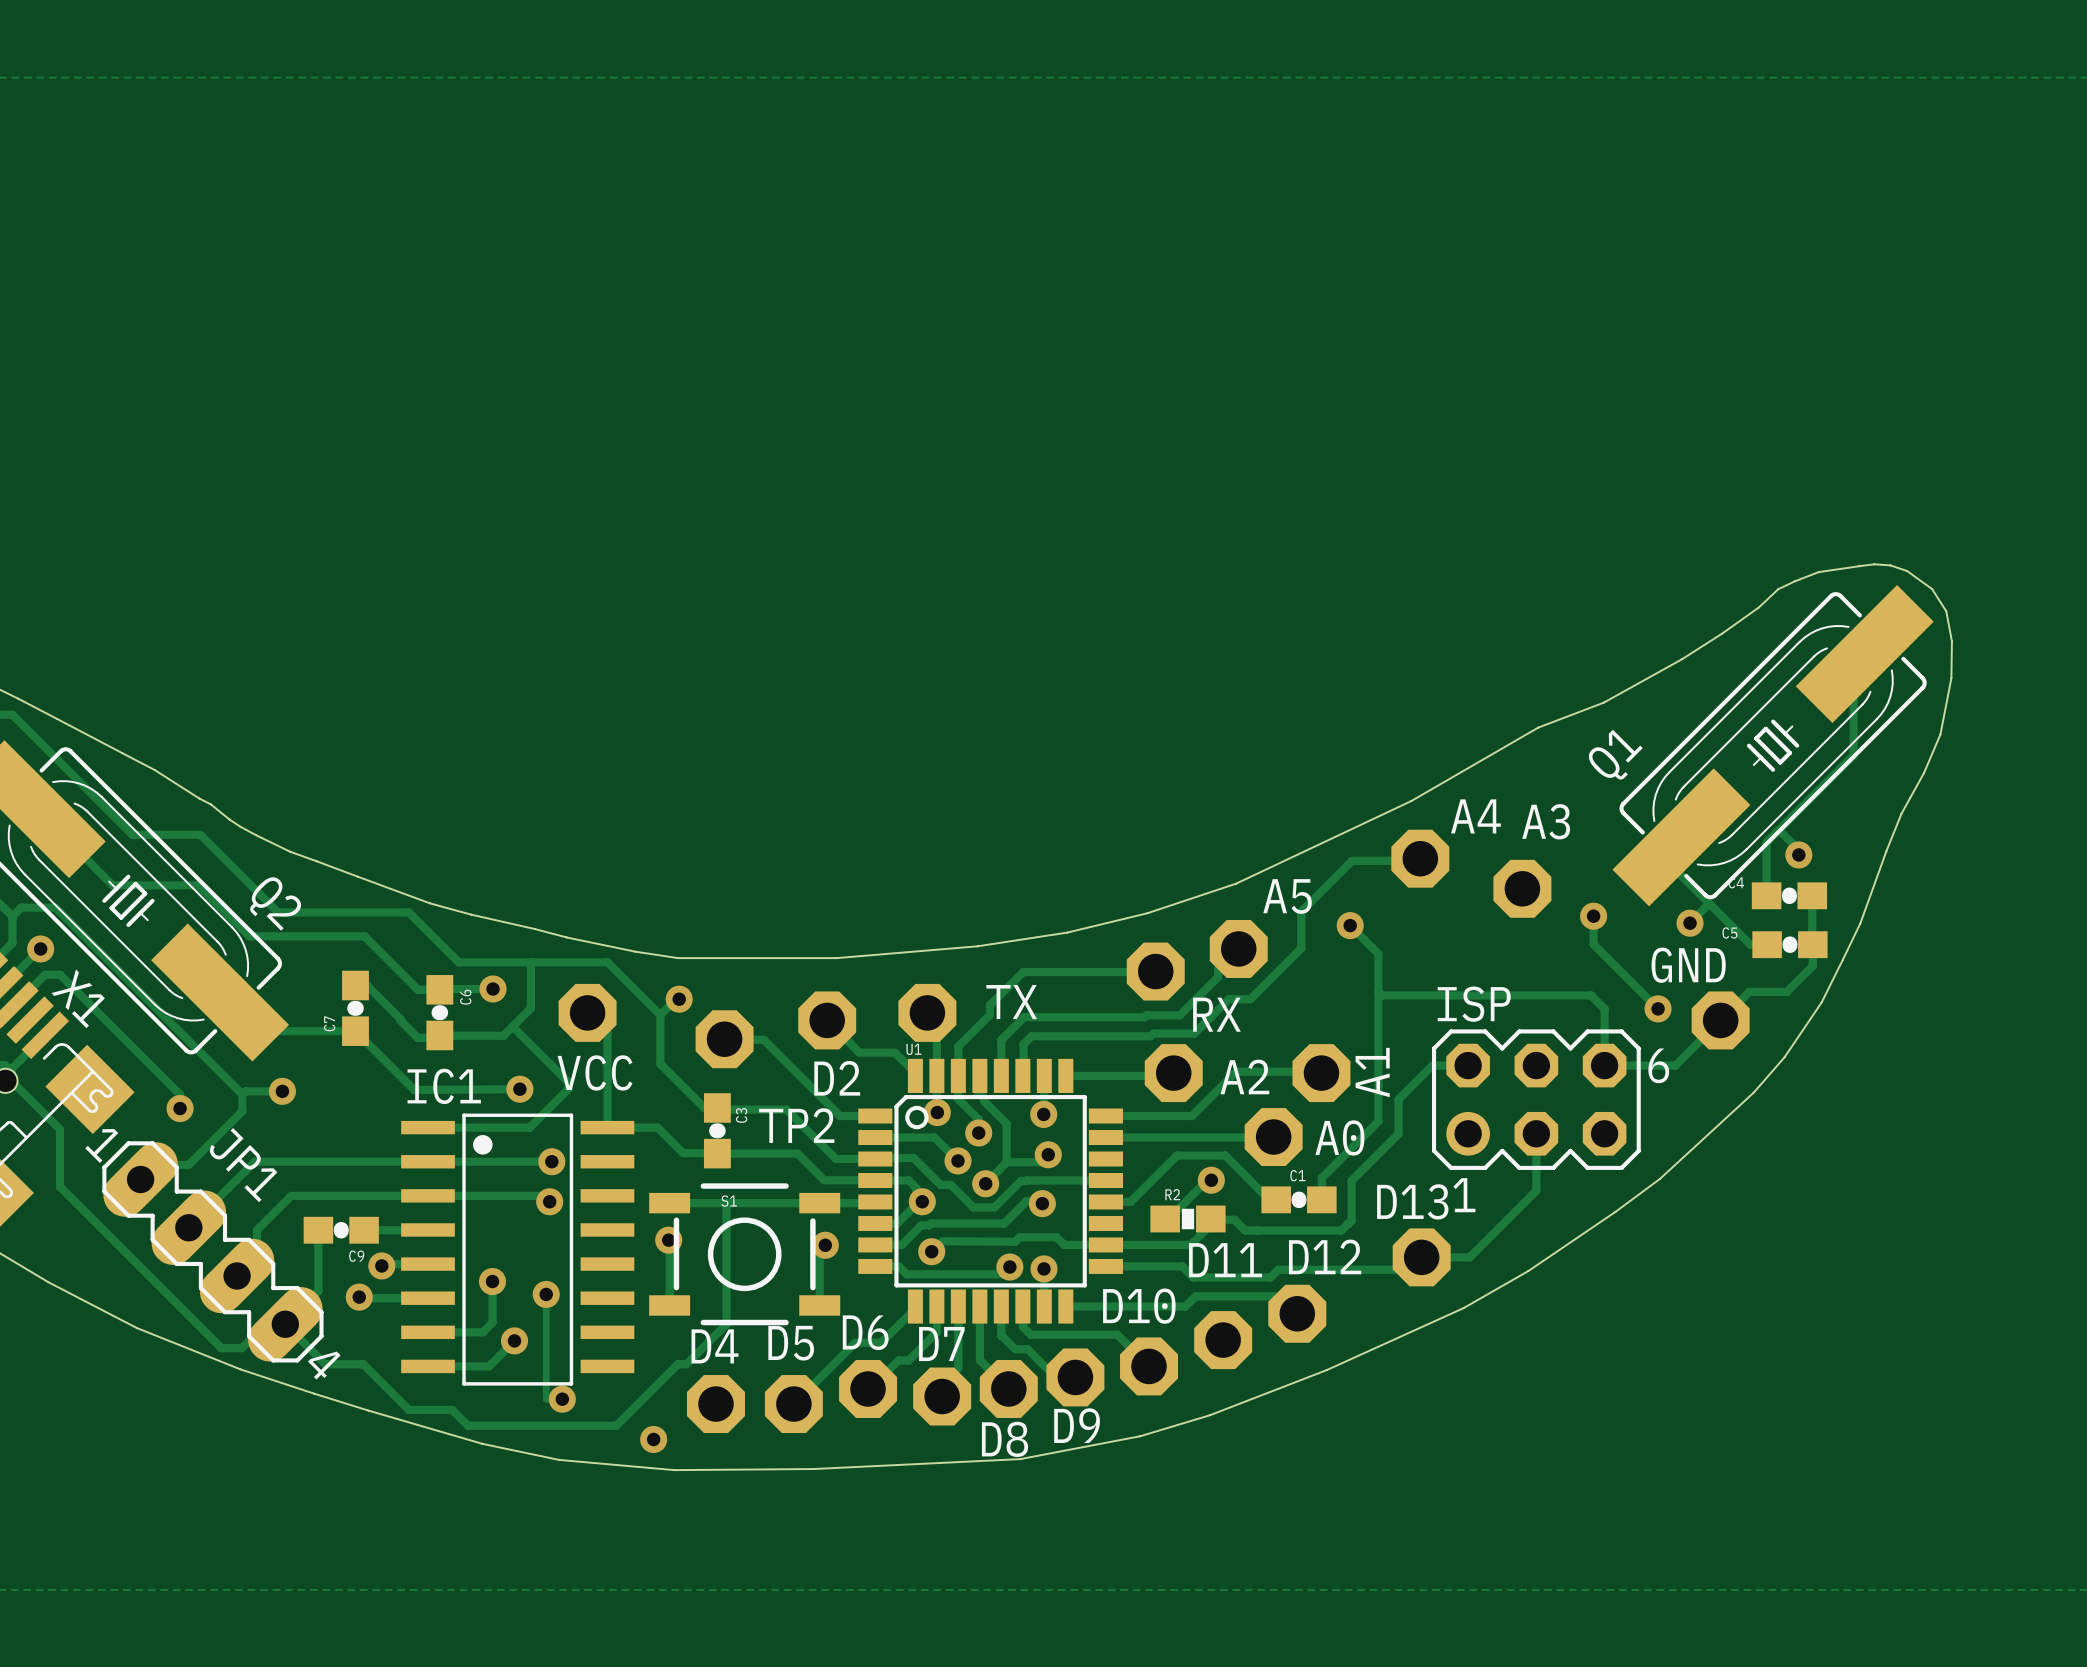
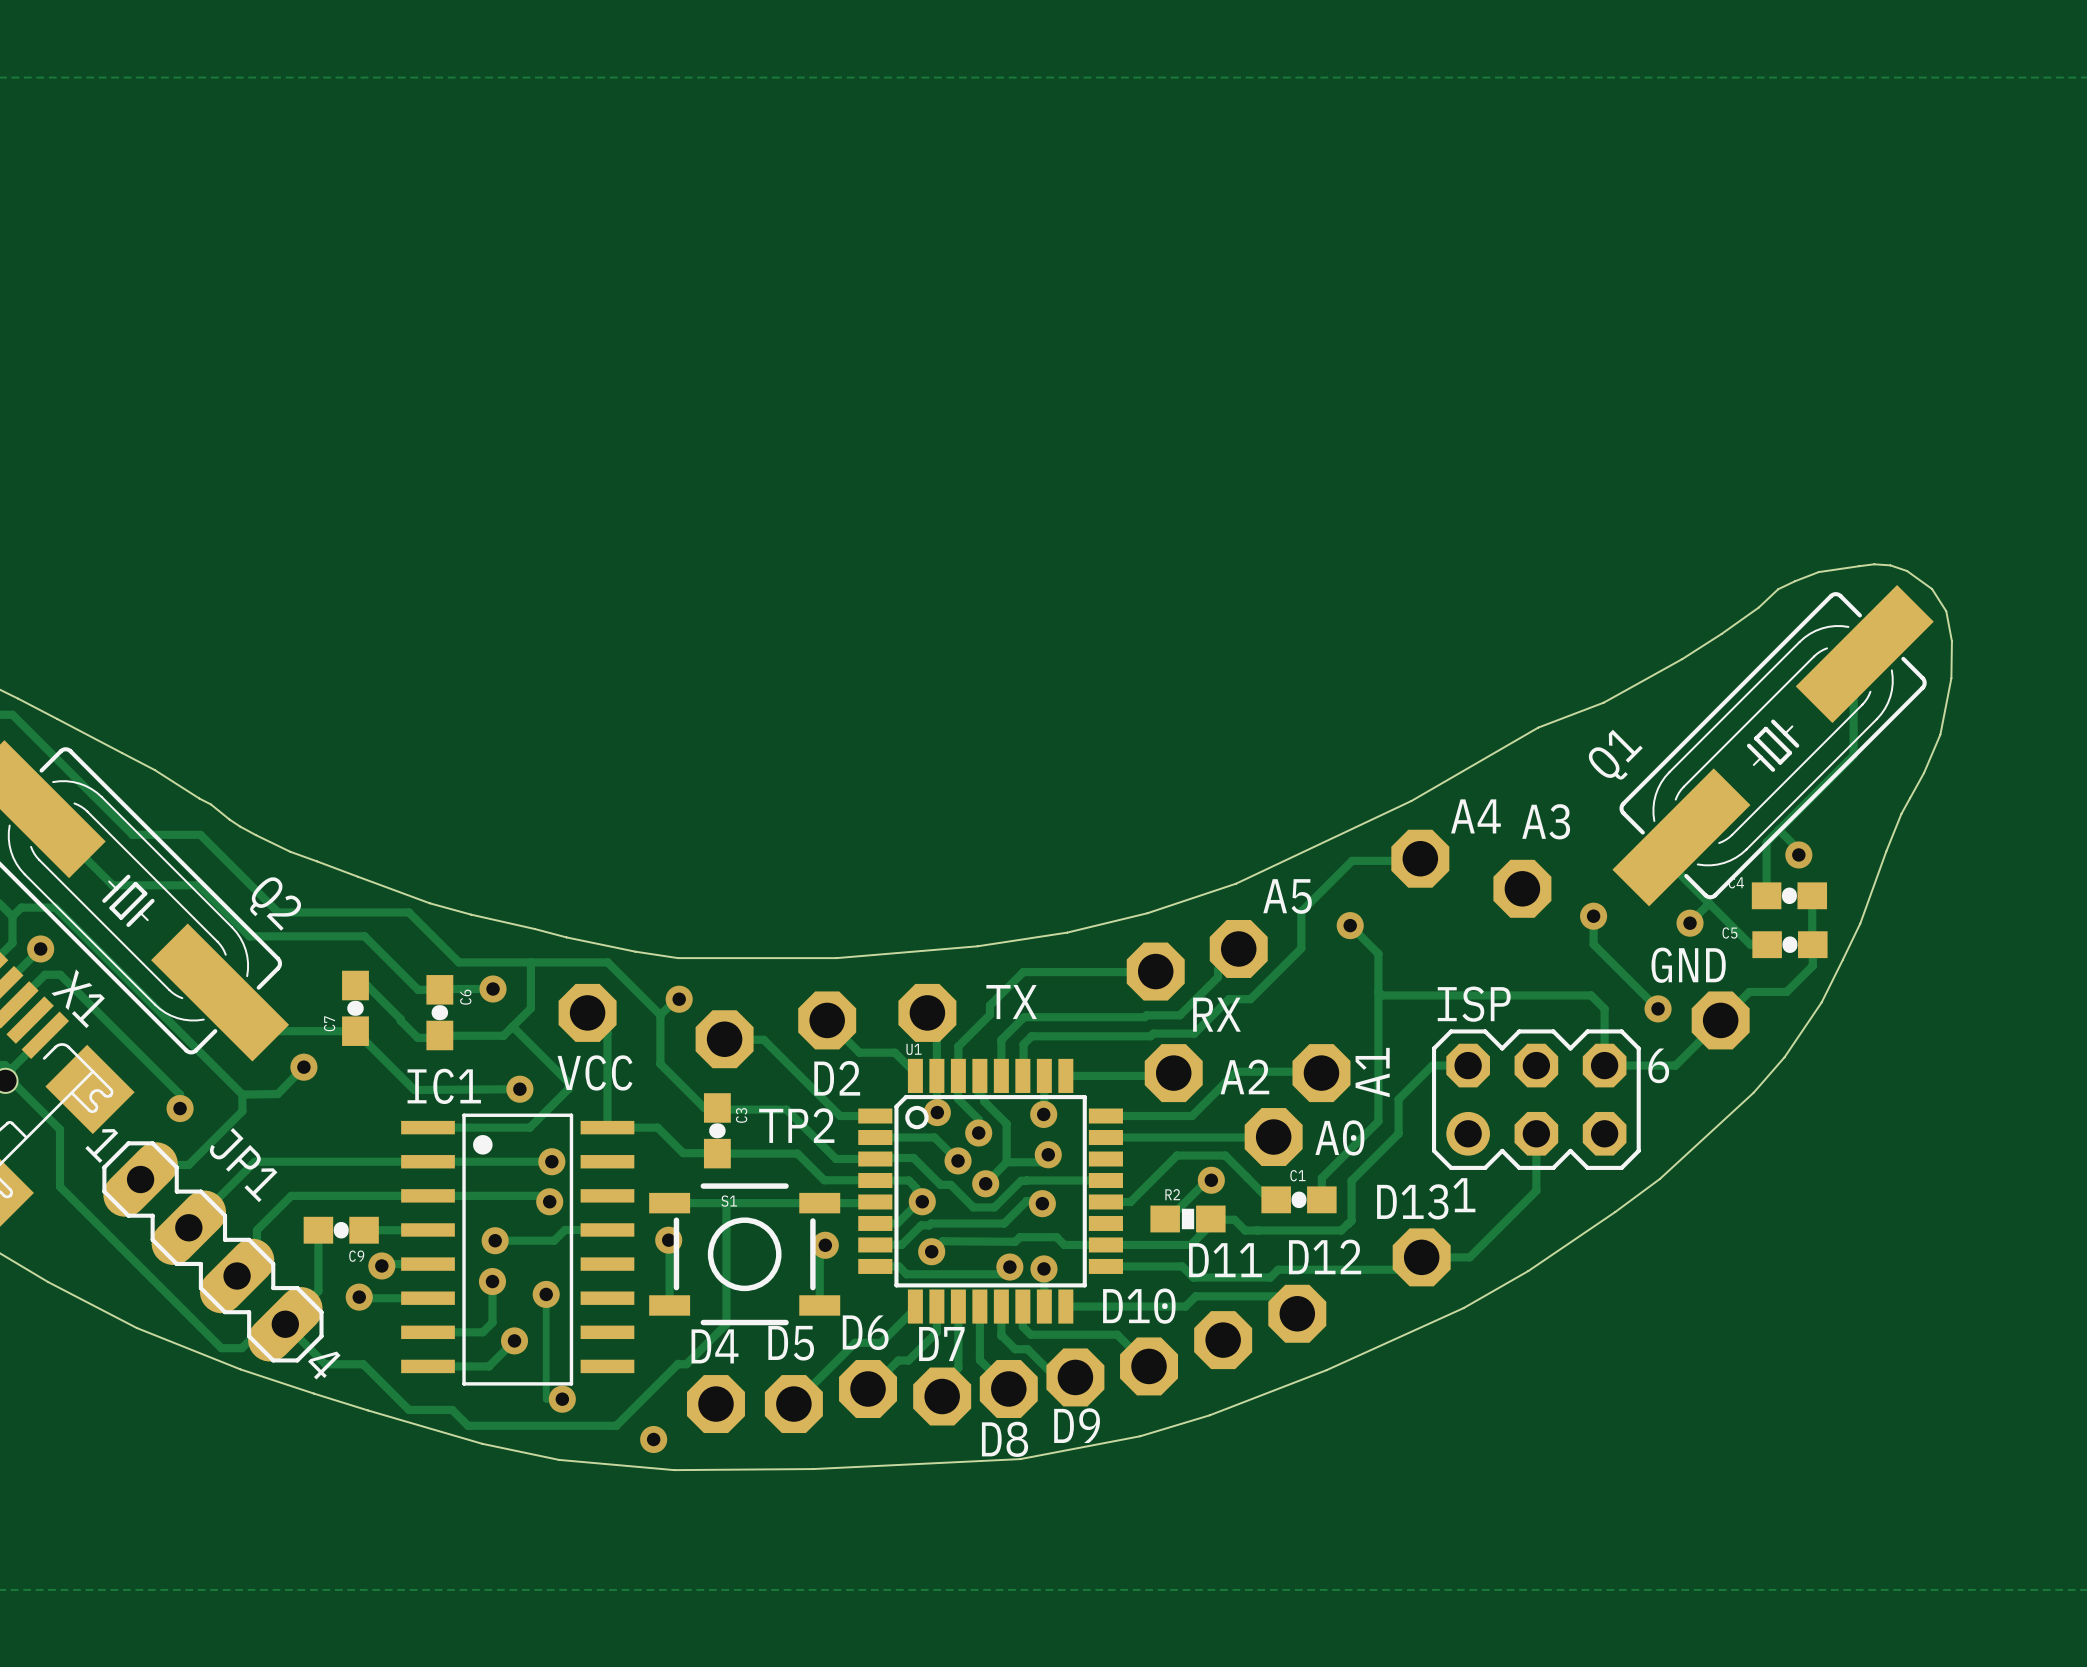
track: (282, 1091) (245, 1091) (242, 1094) -> (303, 1067) (277, 1094) (242, 1094)
via position: (282, 1091) -> (303, 1067)
track: none -> (607, 1229) (565, 1229) (554, 1240) (495, 1240)
via: none -> (495, 1240)

